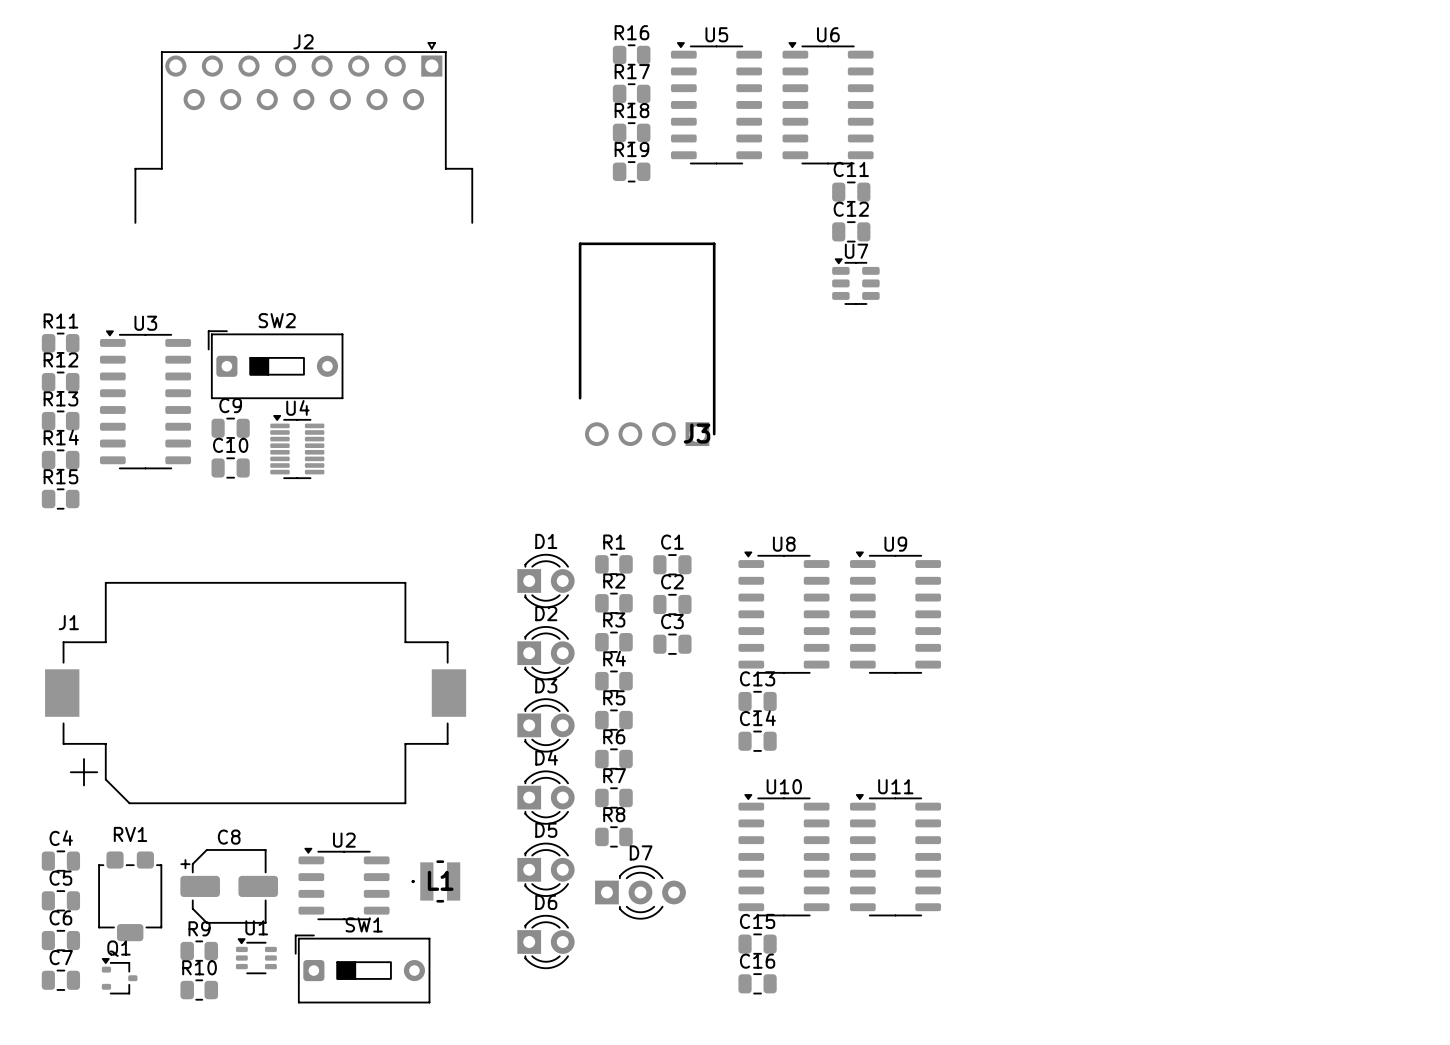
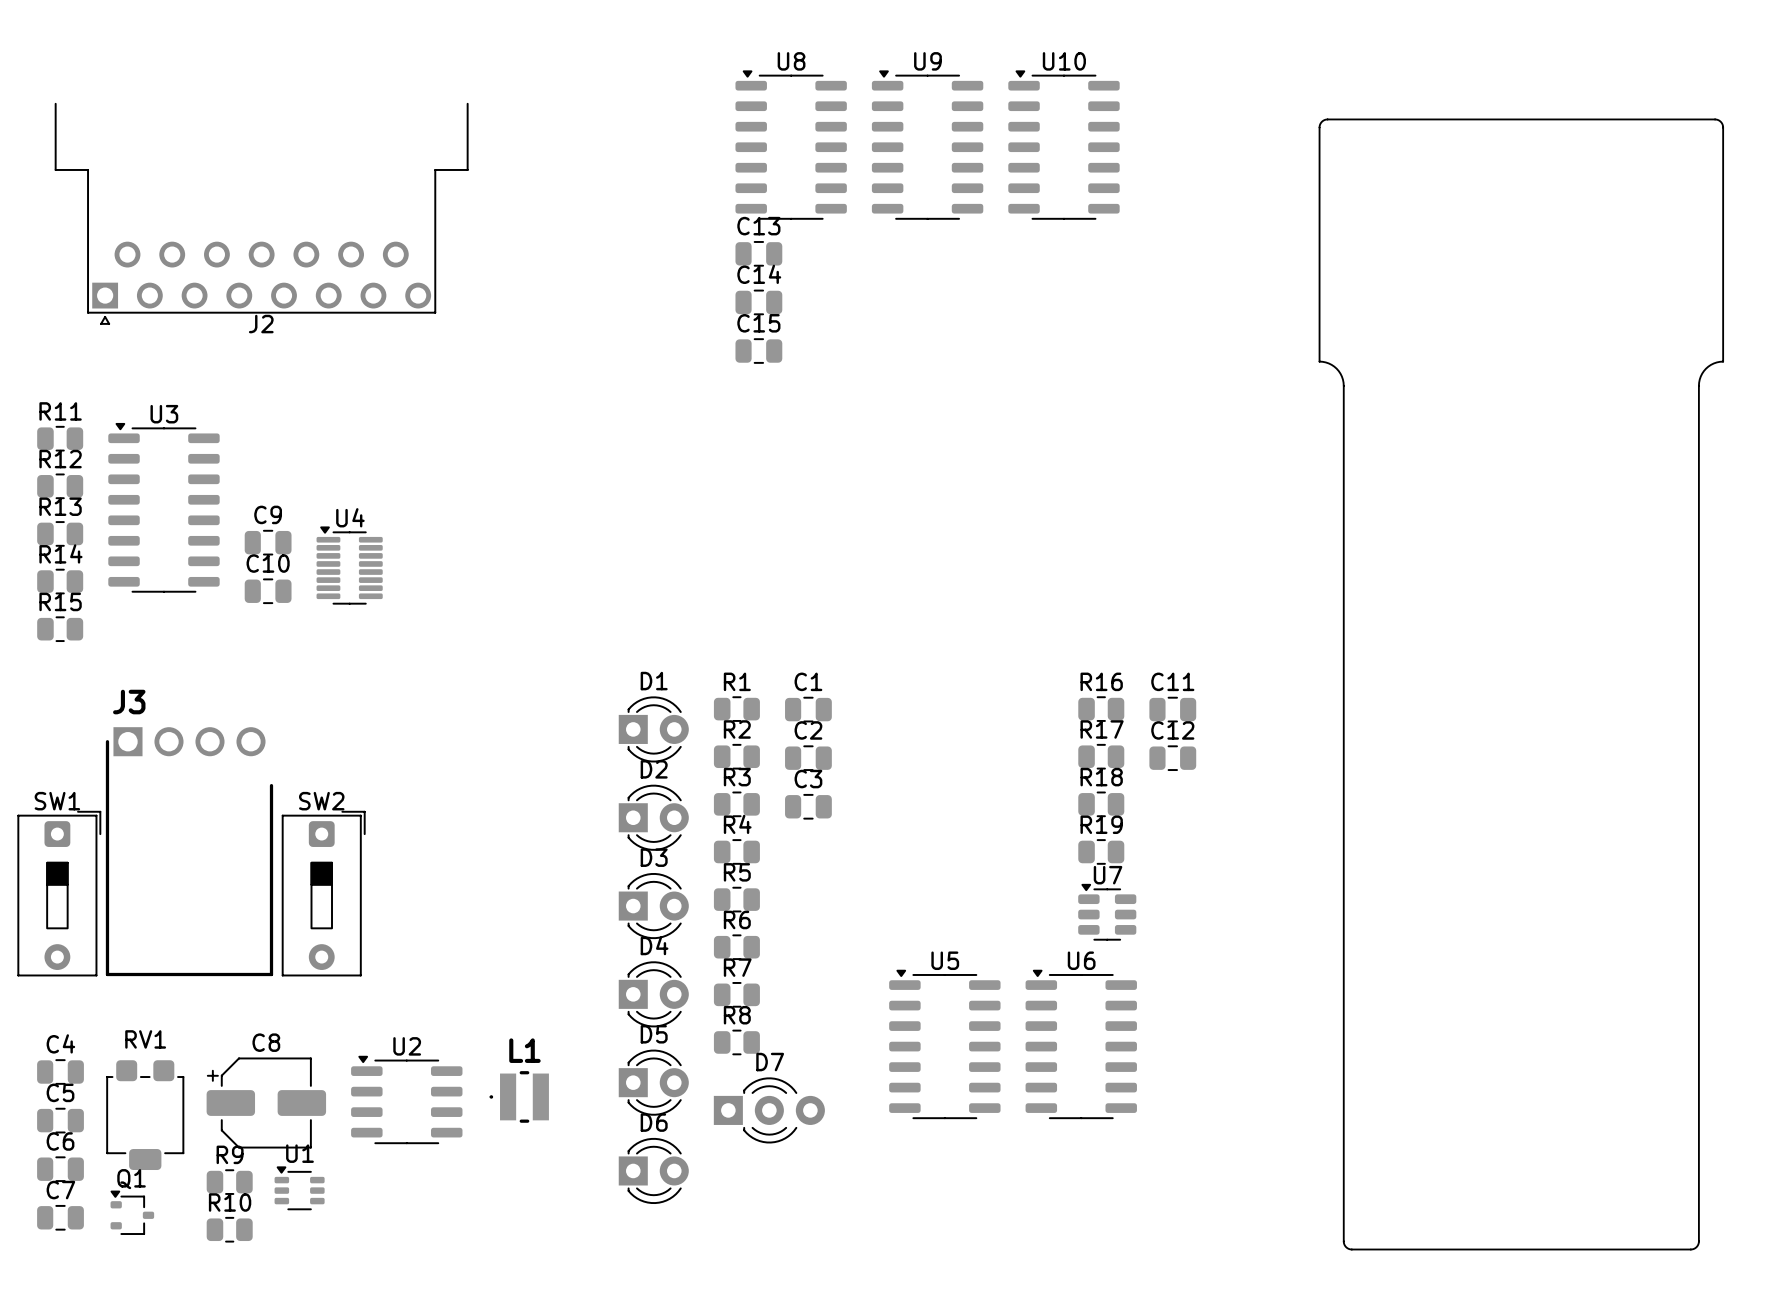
R16 position: (631, 54) -> (1101, 709)
board edge: none -> (1327, 119) (1715, 119) (1719, 121) (1722, 125) (1723, 361) (1713, 363) (1706, 368) (1700, 376) (1698, 385) (1698, 1241) (1697, 1246) (1692, 1249) (1351, 1249) (1346, 1247) (1344, 1243) (1343, 385) (1341, 376) (1336, 368) (1328, 363) (1319, 361) (1319, 127) (1321, 121) (1327, 119)
R17 position: (631, 93) -> (1101, 756)
U5 position: (716, 103) -> (944, 1044)
U6 position: (828, 103) -> (1081, 1044)
J2 rotation: 0° (303, 132) -> 180° (261, 213)
R18 position: (631, 132) -> (1101, 804)
R19 position: (631, 171) -> (1101, 851)
C11 position: (851, 192) -> (1172, 709)
C12 position: (851, 231) -> (1172, 758)
U7 position: (855, 281) -> (1107, 912)
SW2 name position: SW2 (277, 320) -> SW2 (321, 801)
J3 rotation: 0° (647, 344) -> 180° (189, 851)
J3 position: (647, 344) -> (189, 851)
SW2 rotation: 0° (275, 364) -> 90° clockwise (323, 893)
SW2 position: (275, 364) -> (323, 893)
J3 name position: J3 (697, 433) -> J3 (129, 702)
U8 position: (783, 612) -> (791, 145)
U9 position: (895, 612) -> (927, 145)
J1: (255, 693) -> none
C13 position: (757, 701) -> (758, 253)
C14 position: (757, 741) -> (758, 302)
U10 position: (783, 855) -> (1063, 145)
U11: (895, 855) -> none
L1 name position: L1 (440, 880) -> L1 (524, 1050)
SW1 name position: SW1 (364, 924) -> SW1 (57, 801)
C15 position: (757, 944) -> (758, 351)
SW1 rotation: 0° (362, 968) -> 90° clockwise (59, 893)
SW1 position: (362, 968) -> (59, 893)
C16: (757, 983) -> none

